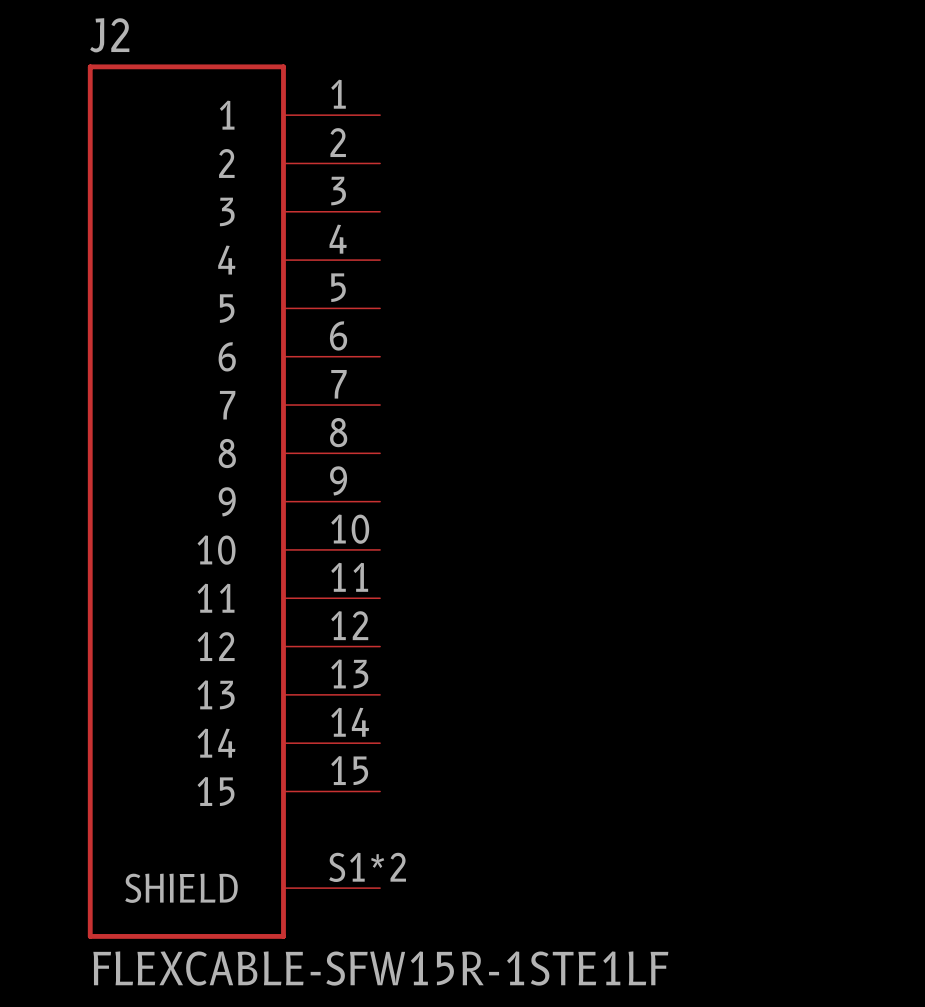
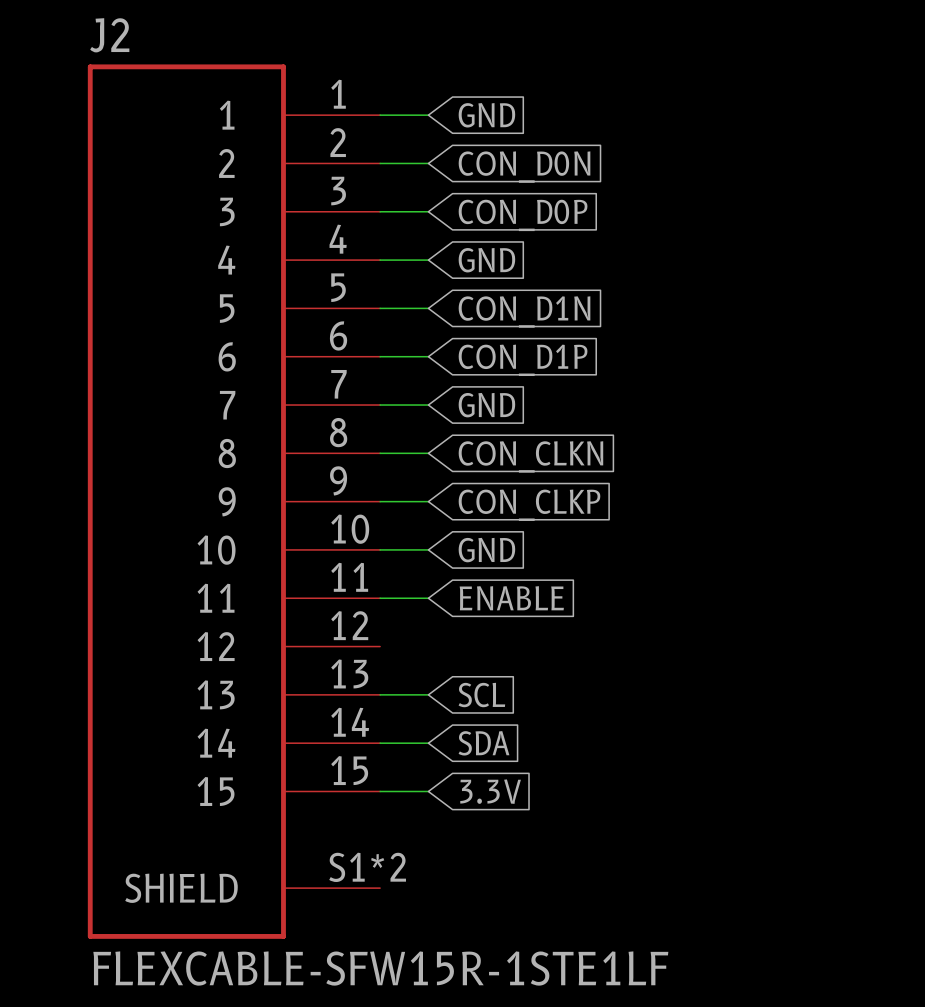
wire: none -> (380, 115) (428, 115)
global label: none -> GND (486, 115)
wire: none -> (380, 163) (428, 163)
global label: none -> CON_D0N (524, 167)
wire: none -> (380, 211) (428, 211)
global label: none -> CON_D0P (523, 215)
wire: none -> (380, 260) (428, 260)
global label: none -> GND (486, 260)
wire: none -> (380, 308) (428, 308)
global label: none -> CON_D1N (524, 312)
wire: none -> (380, 356) (428, 356)
global label: none -> CON_D1P (523, 360)
wire: none -> (380, 405) (428, 405)
global label: none -> GND (486, 405)
wire: none -> (380, 453) (428, 453)
global label: none -> CON_CLKN (530, 456)
wire: none -> (380, 501) (428, 501)
global label: none -> CON_CLKP (529, 505)
wire: none -> (380, 549) (428, 549)
global label: none -> GND (486, 550)
wire: none -> (380, 598) (428, 598)
global label: none -> ENABLE (511, 598)
wire: none -> (380, 694) (428, 694)
global label: none -> SCL (481, 695)
wire: none -> (380, 743) (428, 743)
global label: none -> SDA (483, 743)
wire: none -> (380, 791) (428, 791)
global label: none -> 3.3V (490, 791)

